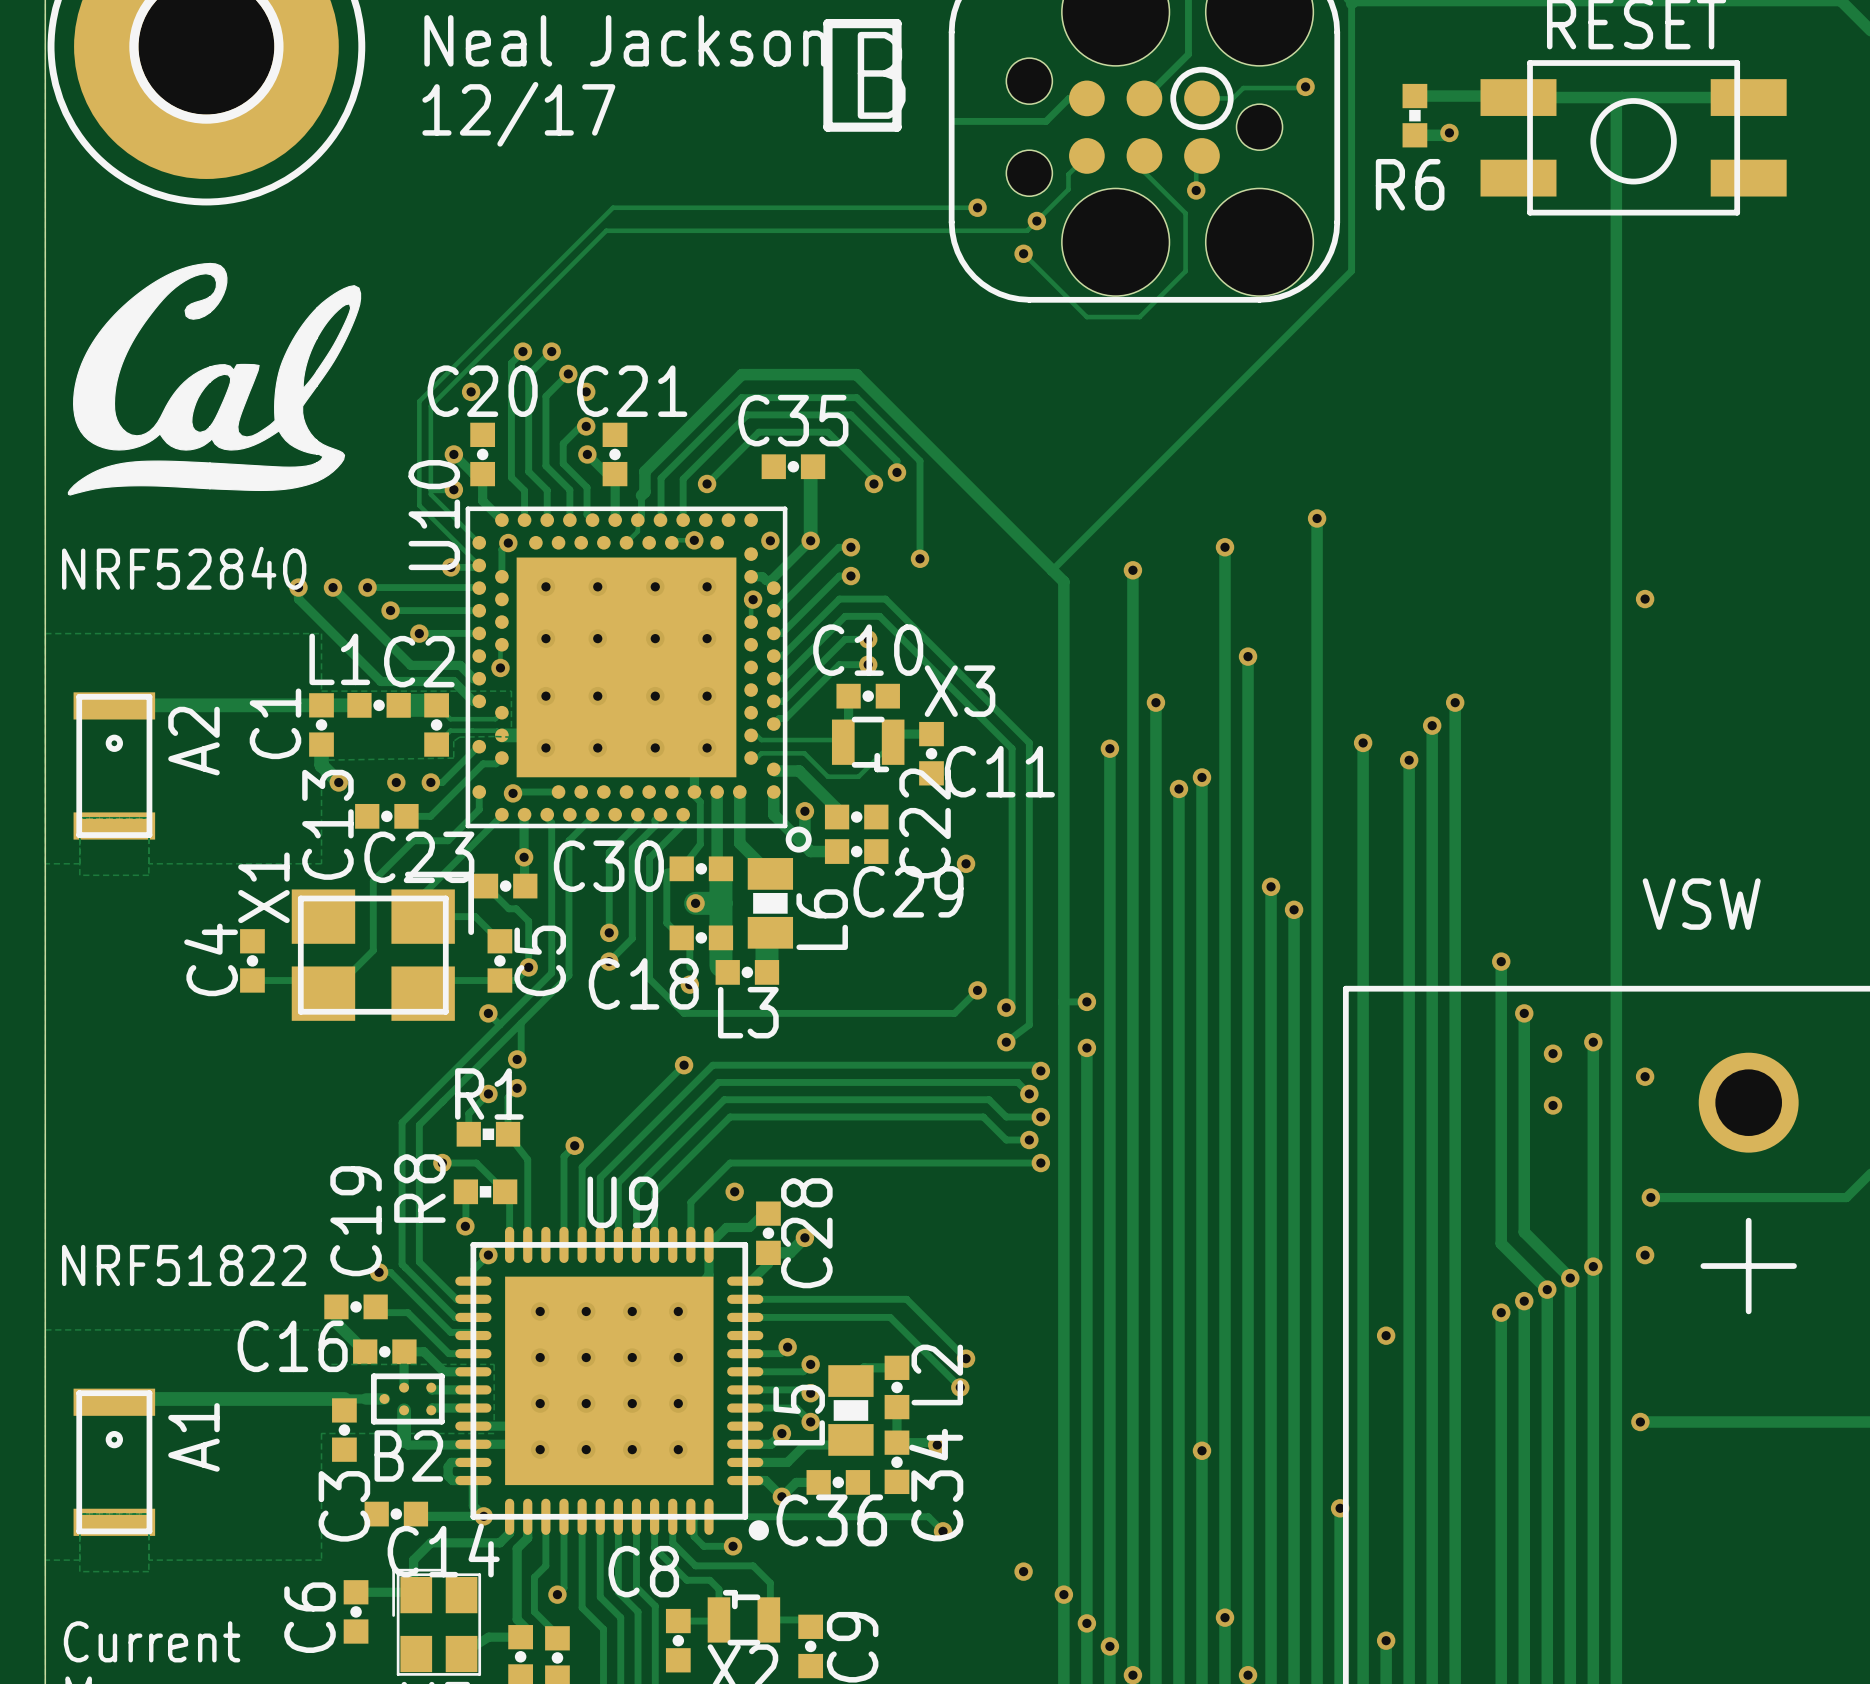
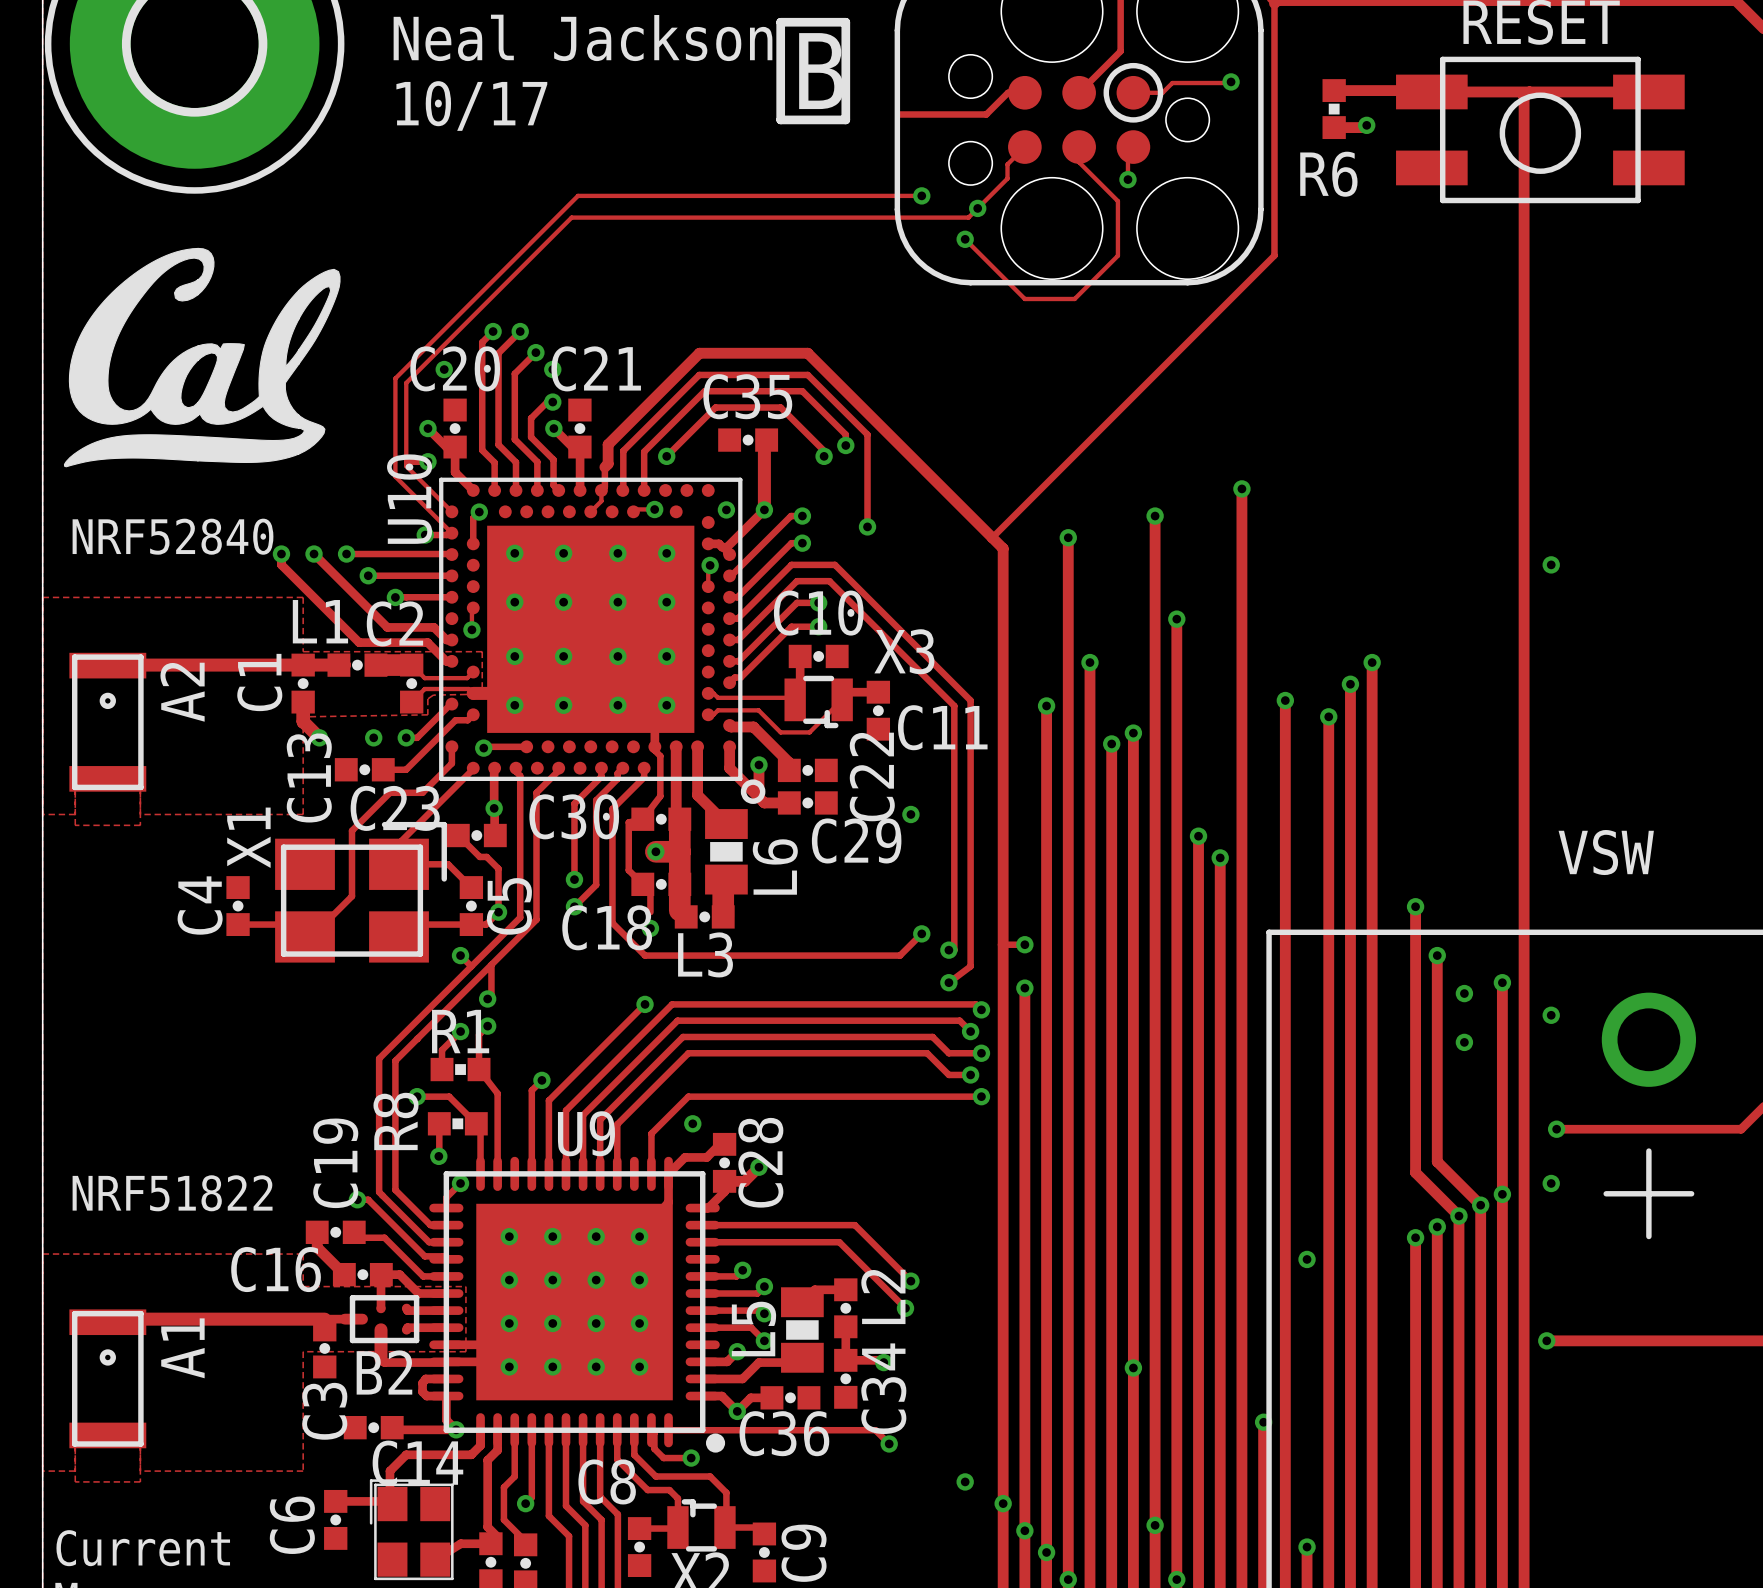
text: 12/17 (518, 114) -> 10/17 (471, 106)

